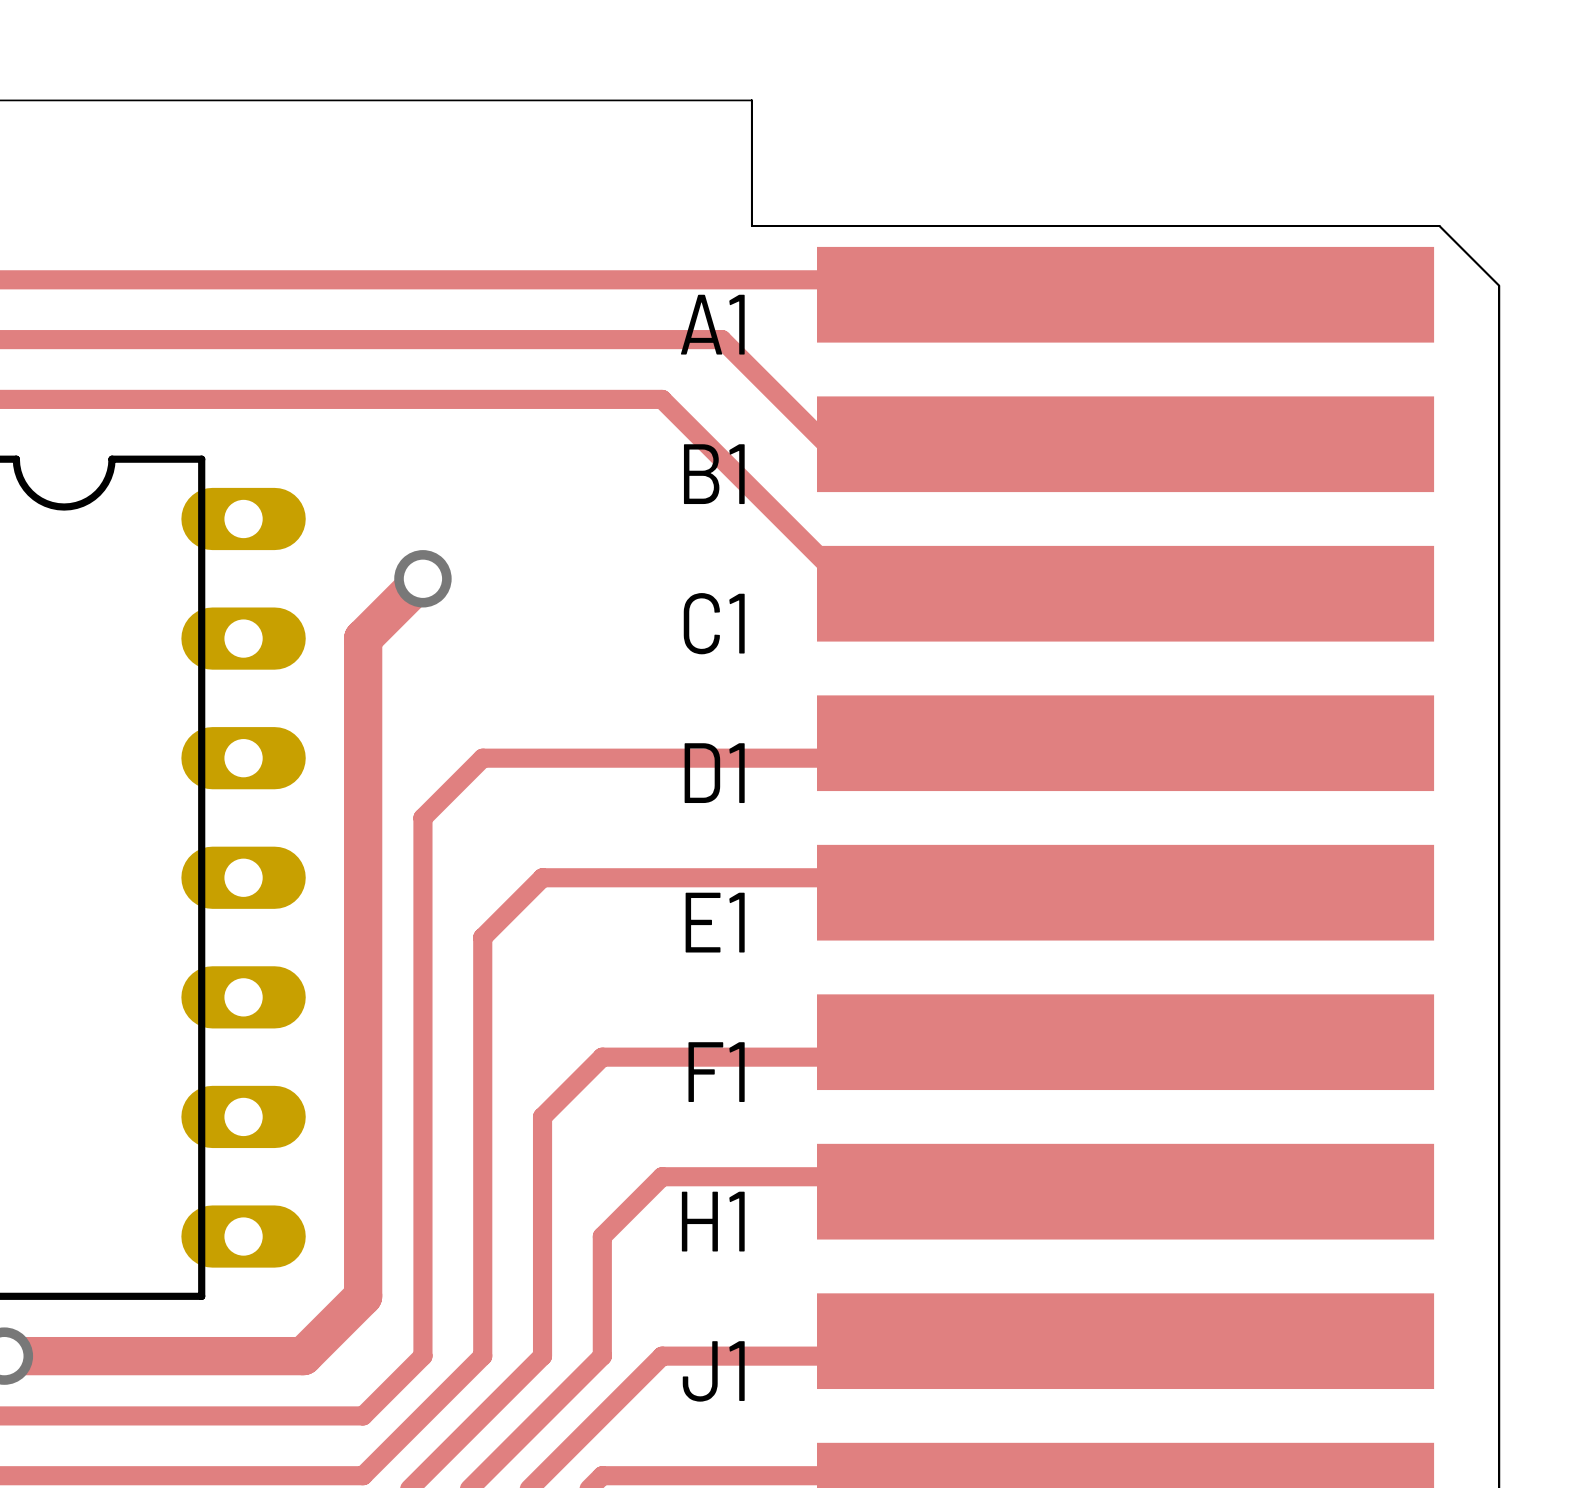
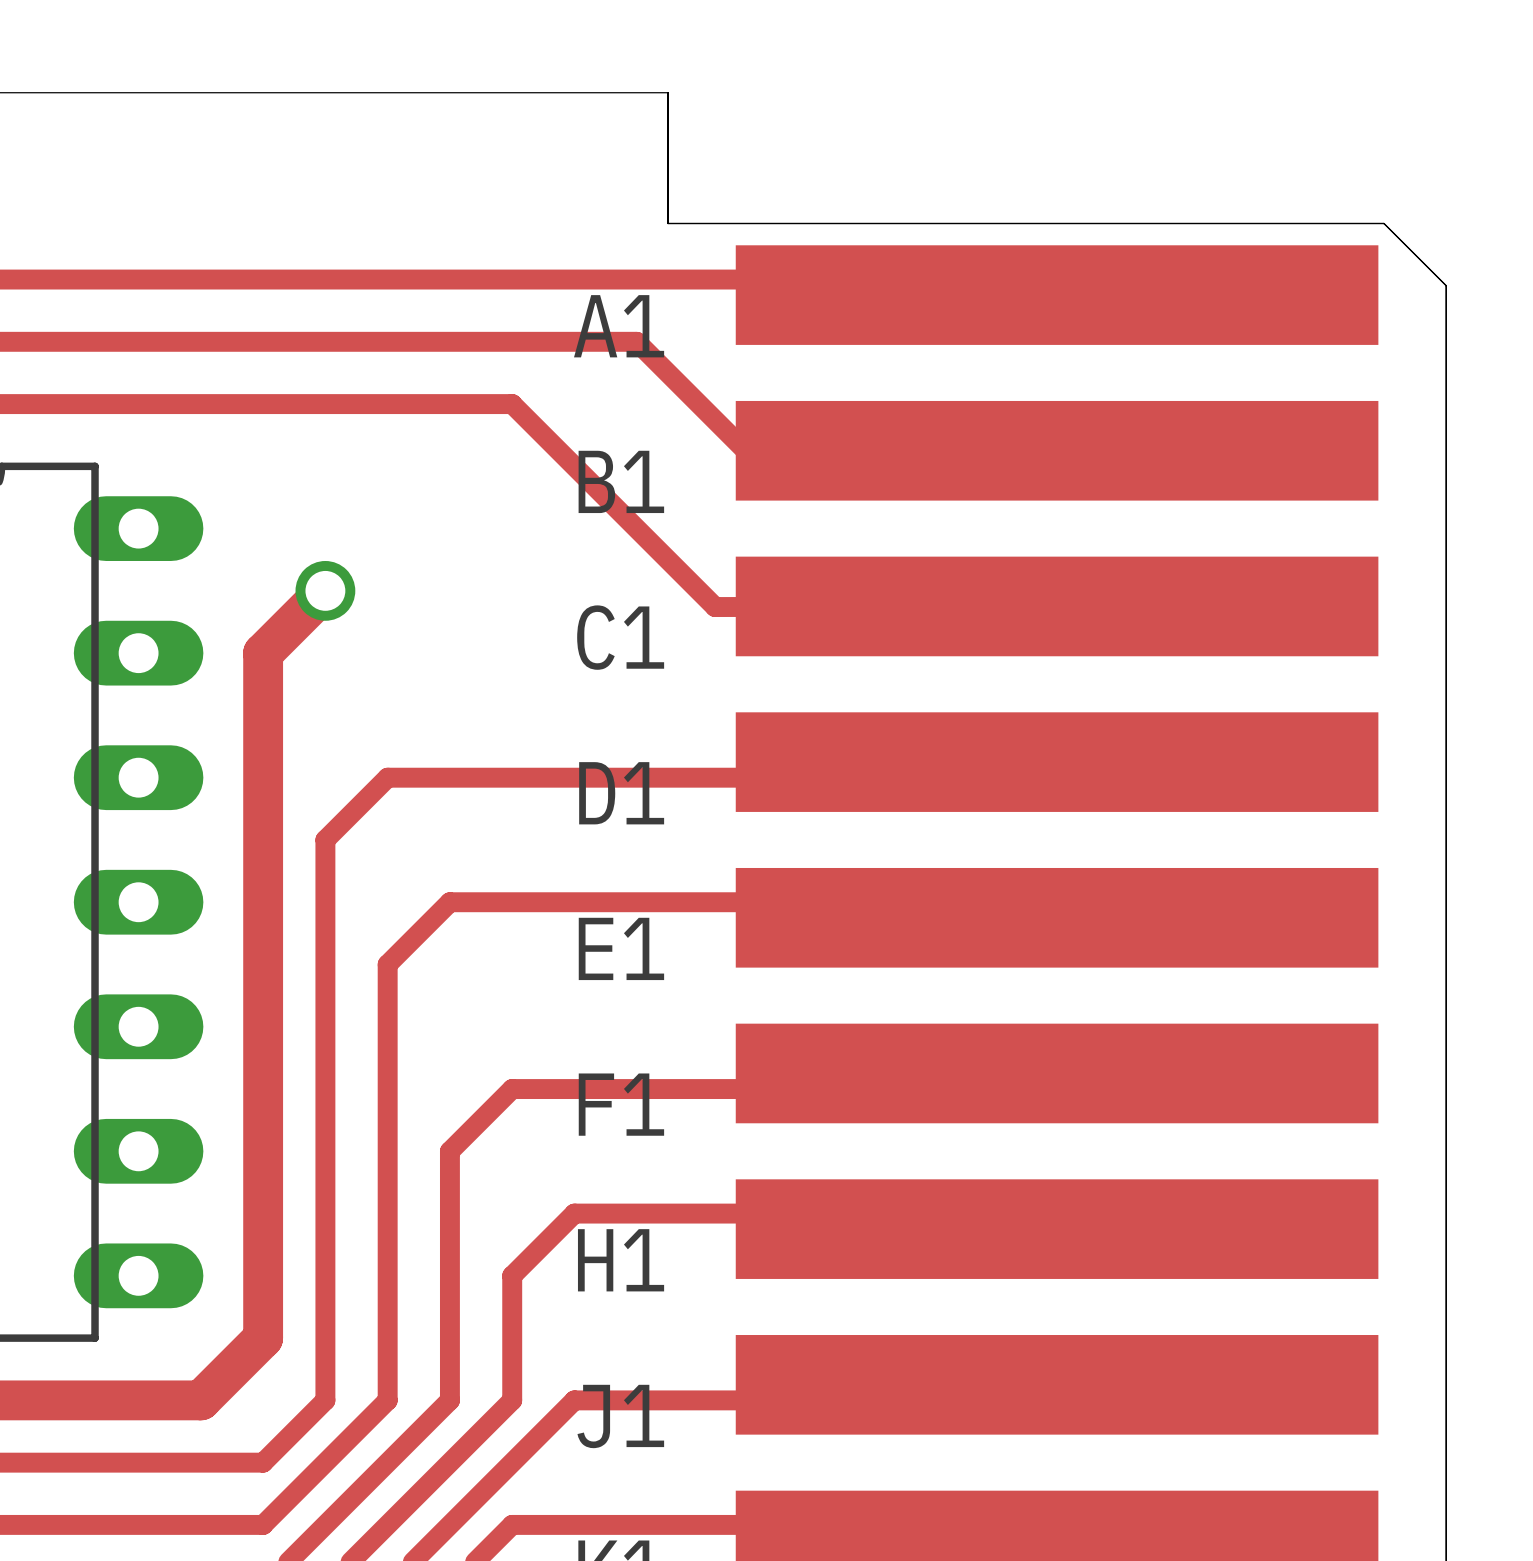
track: (602, 399) (662, 399) (857, 594) (1125, 593) -> (512, 404) (715, 607) (1057, 606)

